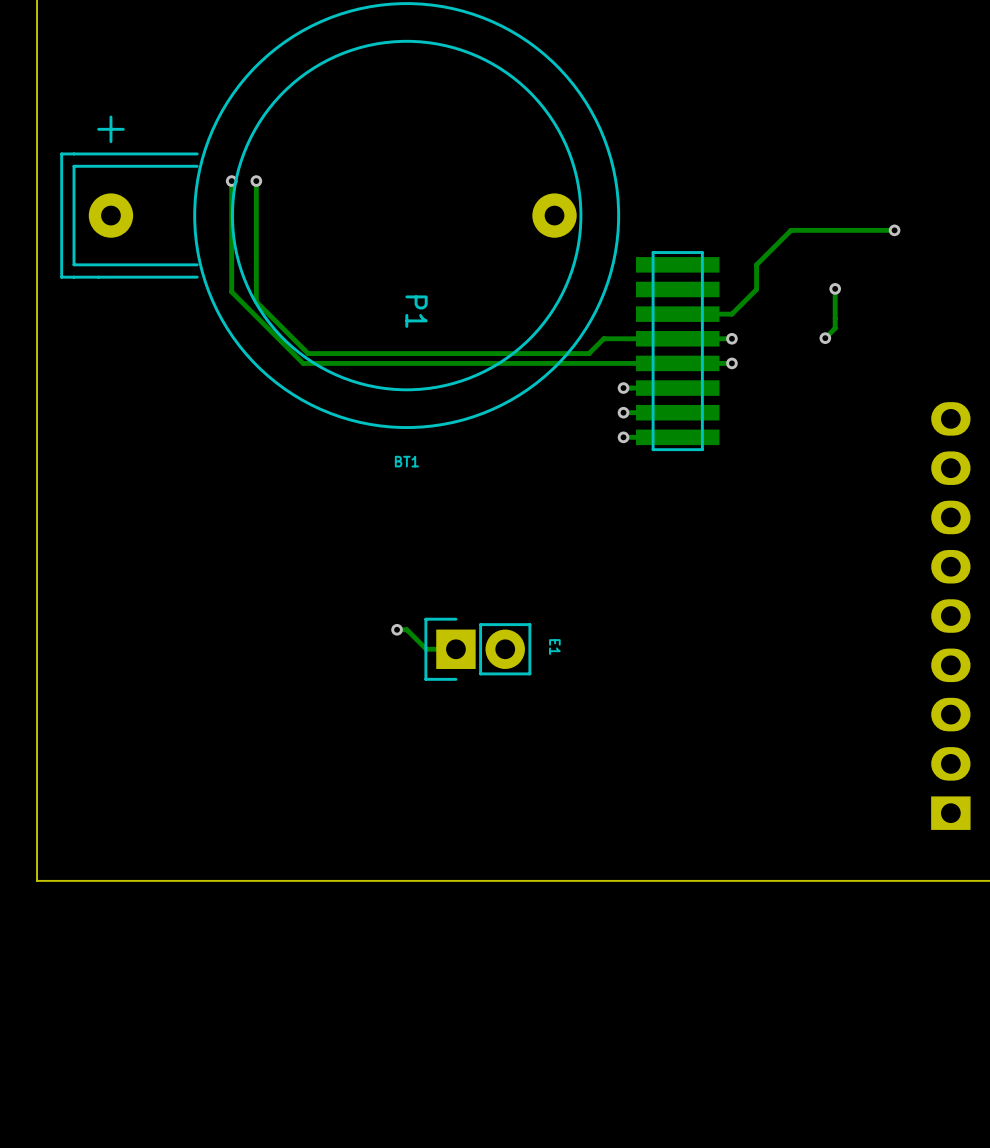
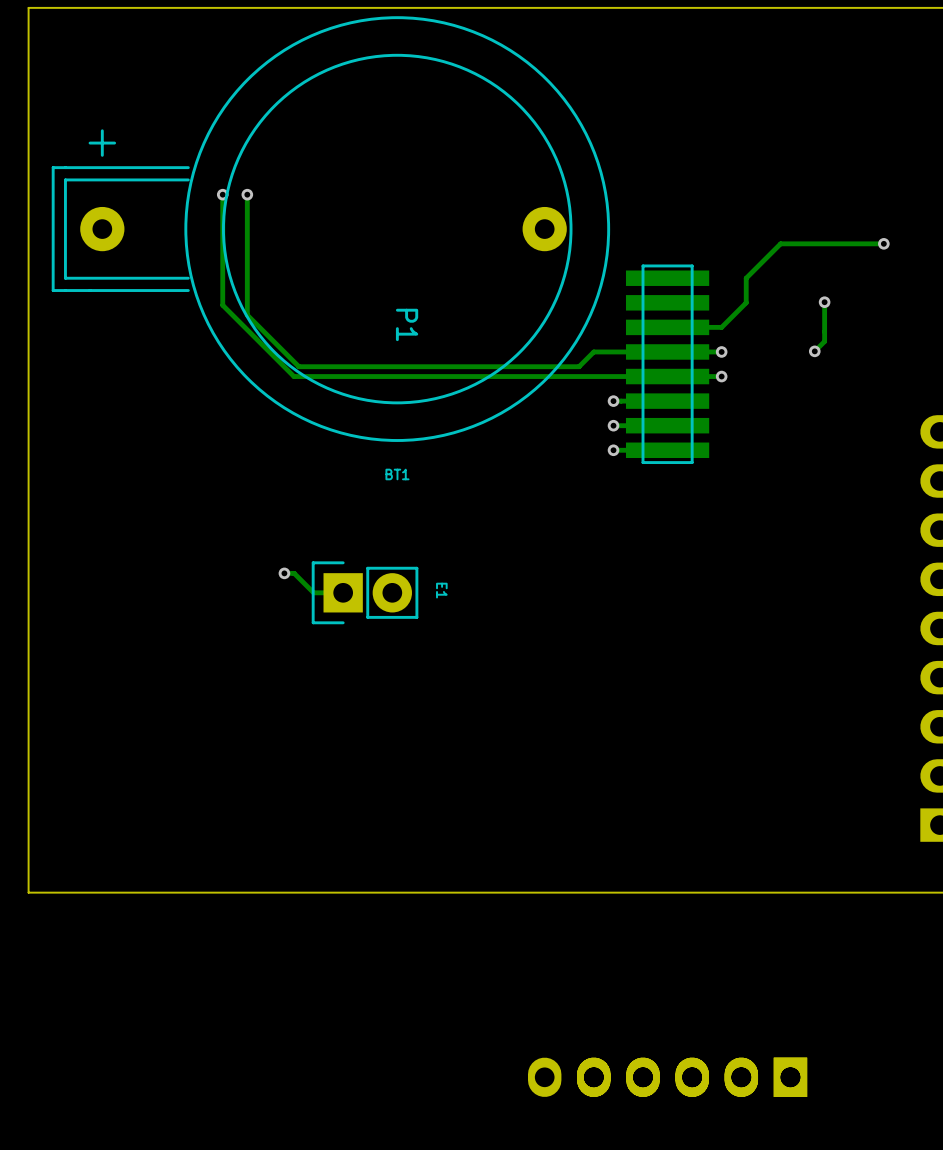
via: none -> (284, 573)
track: (397, 629) (406, 629) (426, 649) (455, 649) -> (284, 573) (294, 573) (313, 592) (343, 592)
via: (397, 629) -> none
E1 position: (477, 649) -> (365, 592)
part: none -> (667, 1077)
part: none -> (692, 1077)

